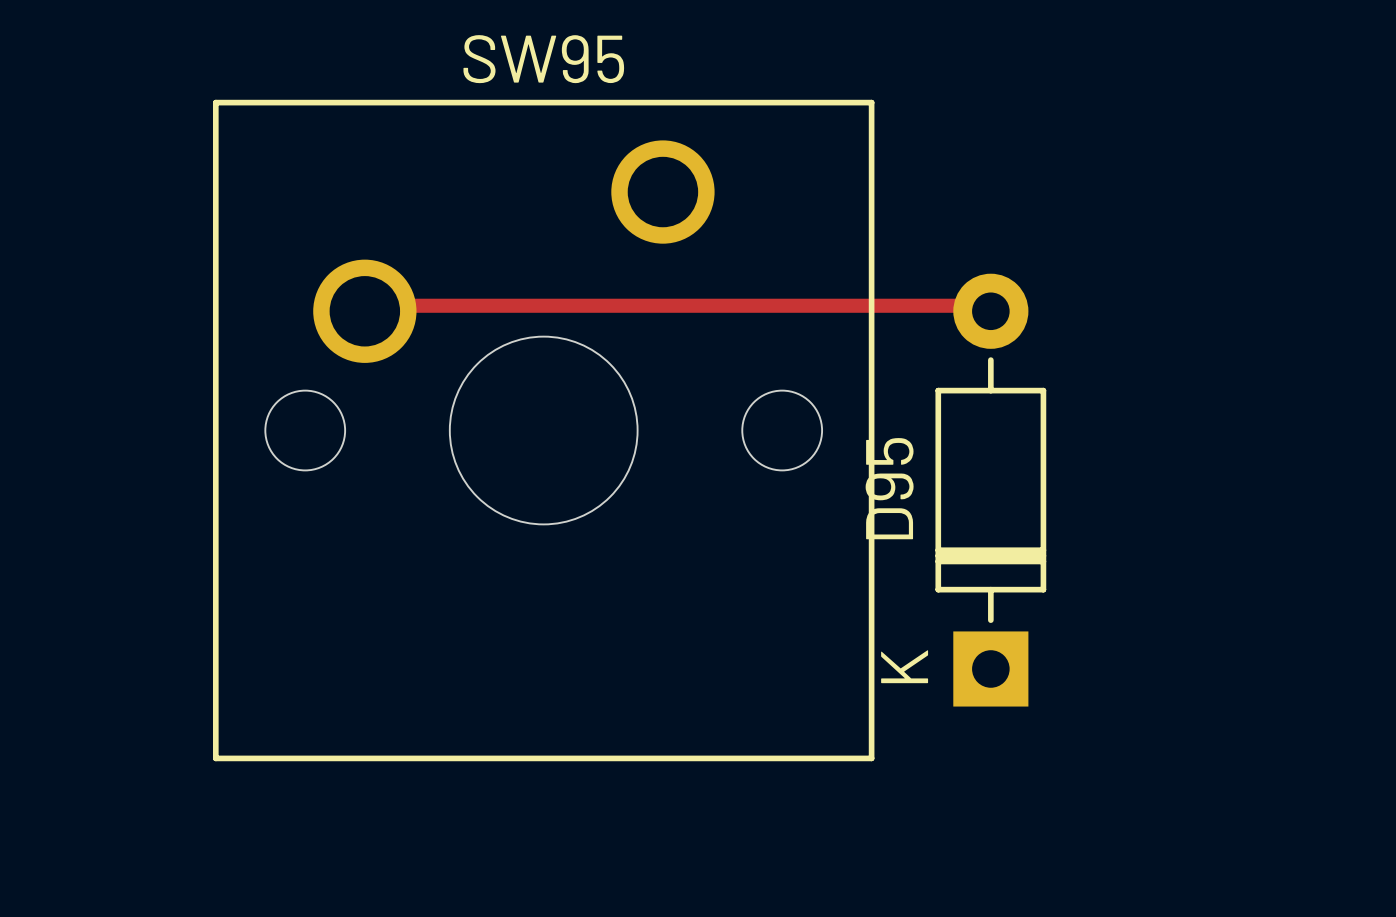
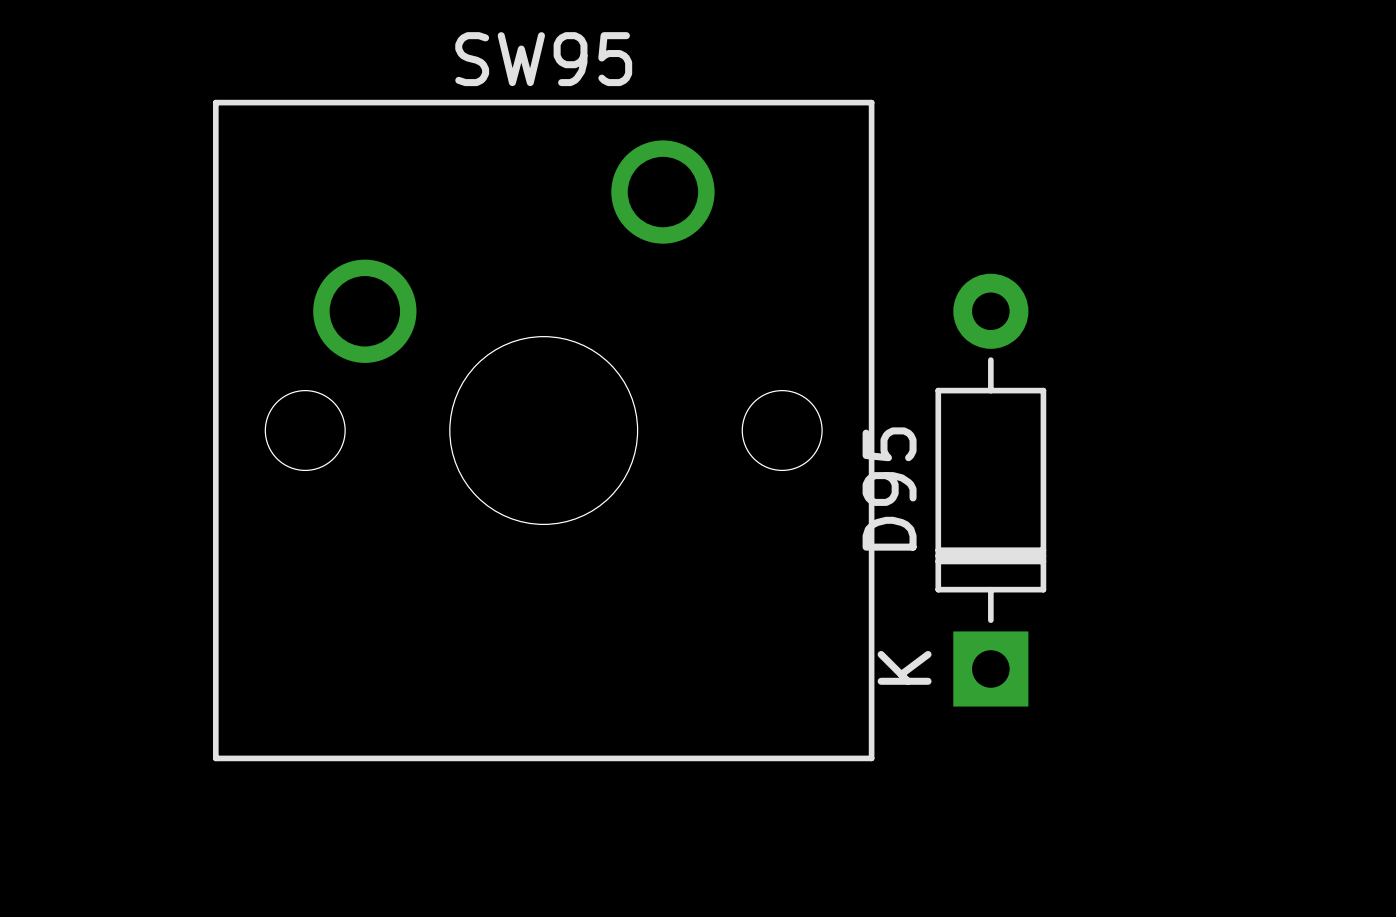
top track: (364, 311) (370, 305) (985, 305) (990, 311) -> none

